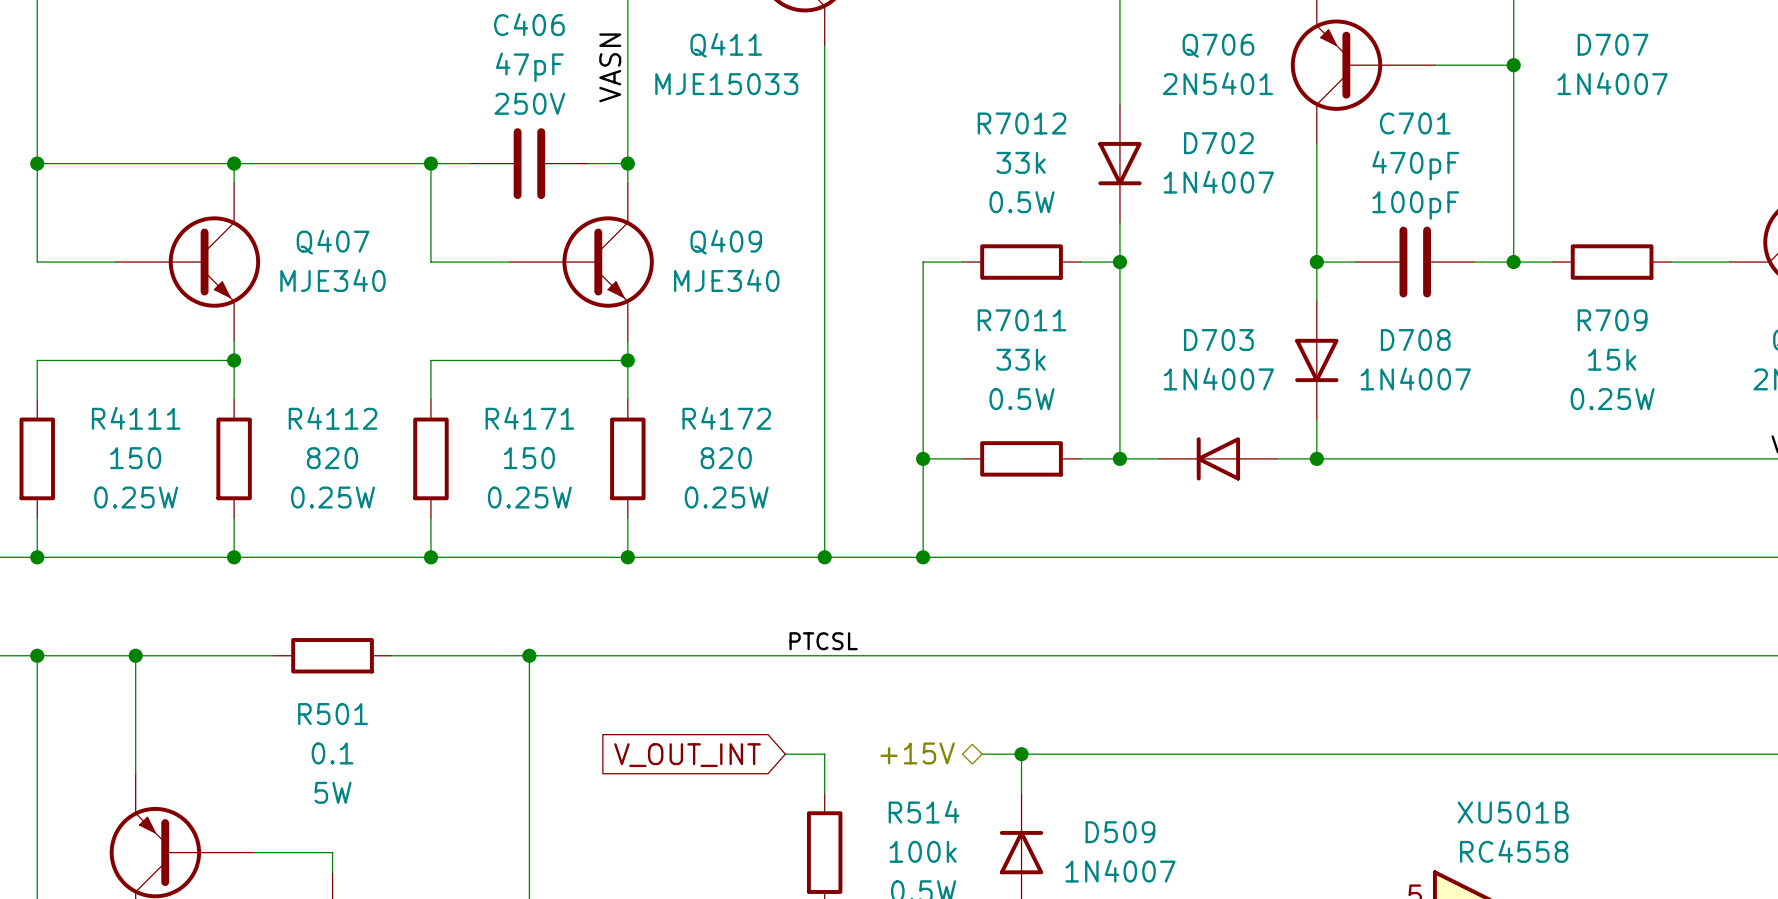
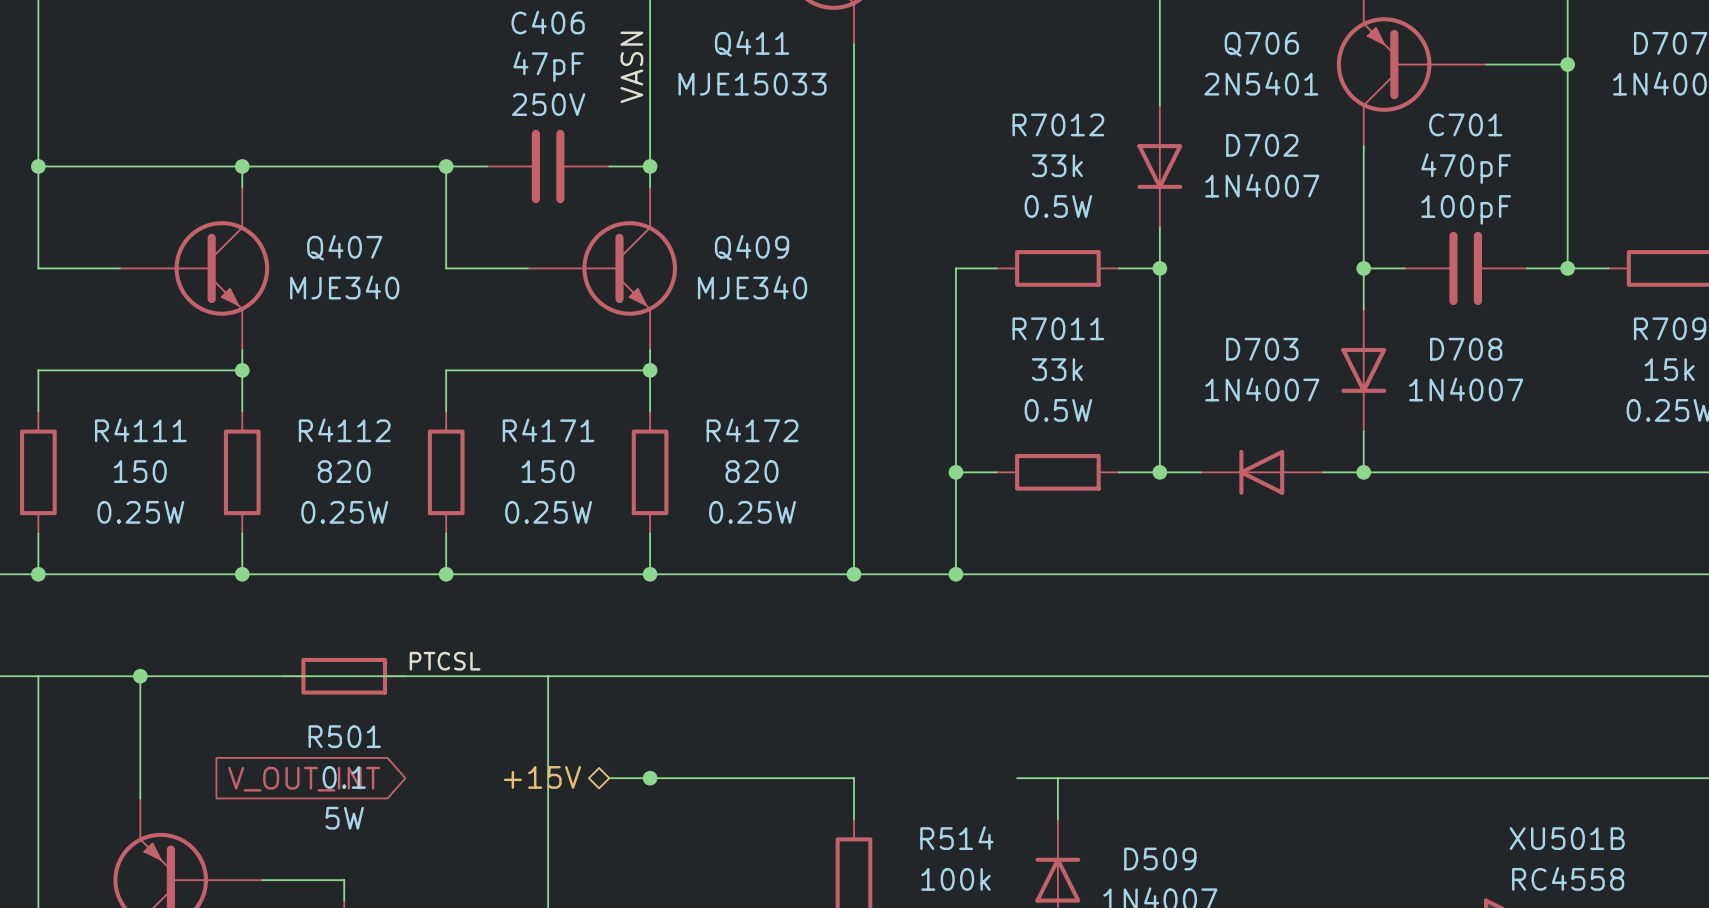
label: none -> PTCSL (445, 661)
label: PTCSL (823, 641) -> none
junction: (37, 655) -> none
wire: none -> (283, 676) (405, 676)
junction: (529, 655) -> none
hierarchical label: none -> +15V (542, 777)
hierarchical label: +15V (917, 753) -> none
wire: none -> (609, 778) (813, 778)
junction: none -> (650, 778)
junction: (1021, 754) -> none
global label: none -> V_OUT_INT (304, 779)
global label: V_OUT_INT (687, 755) -> none

